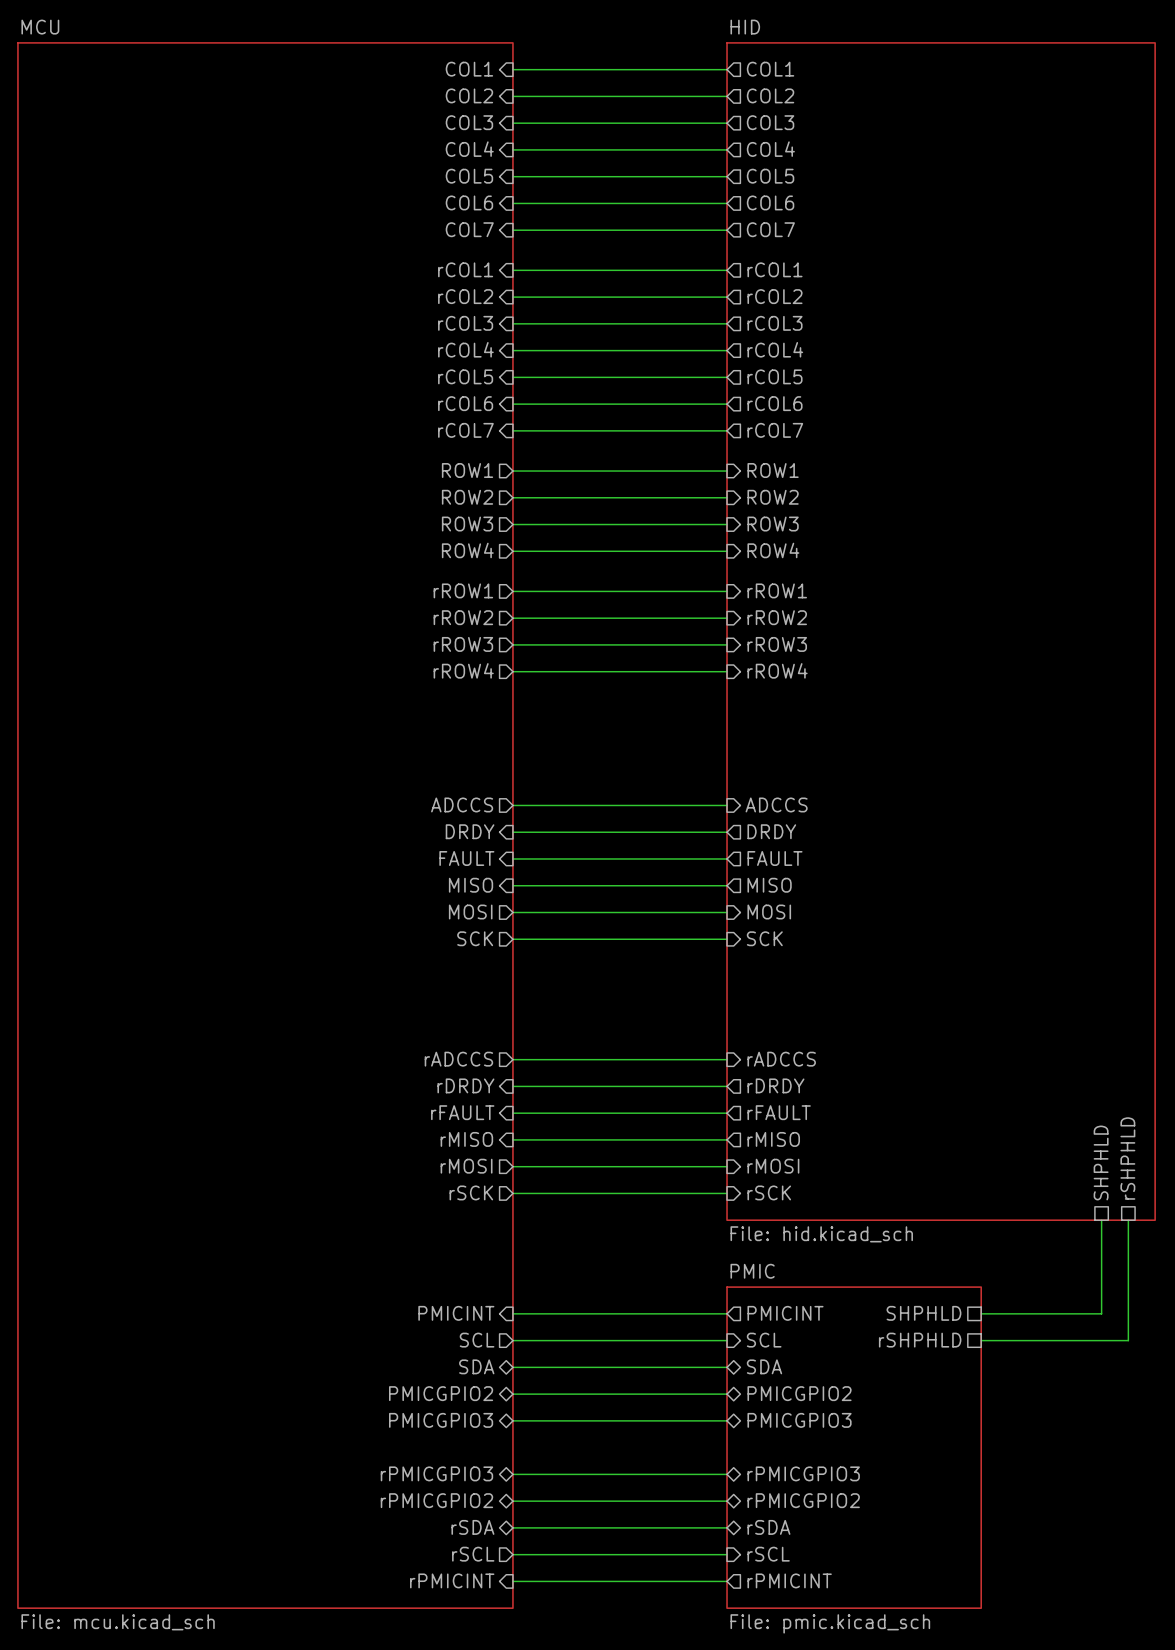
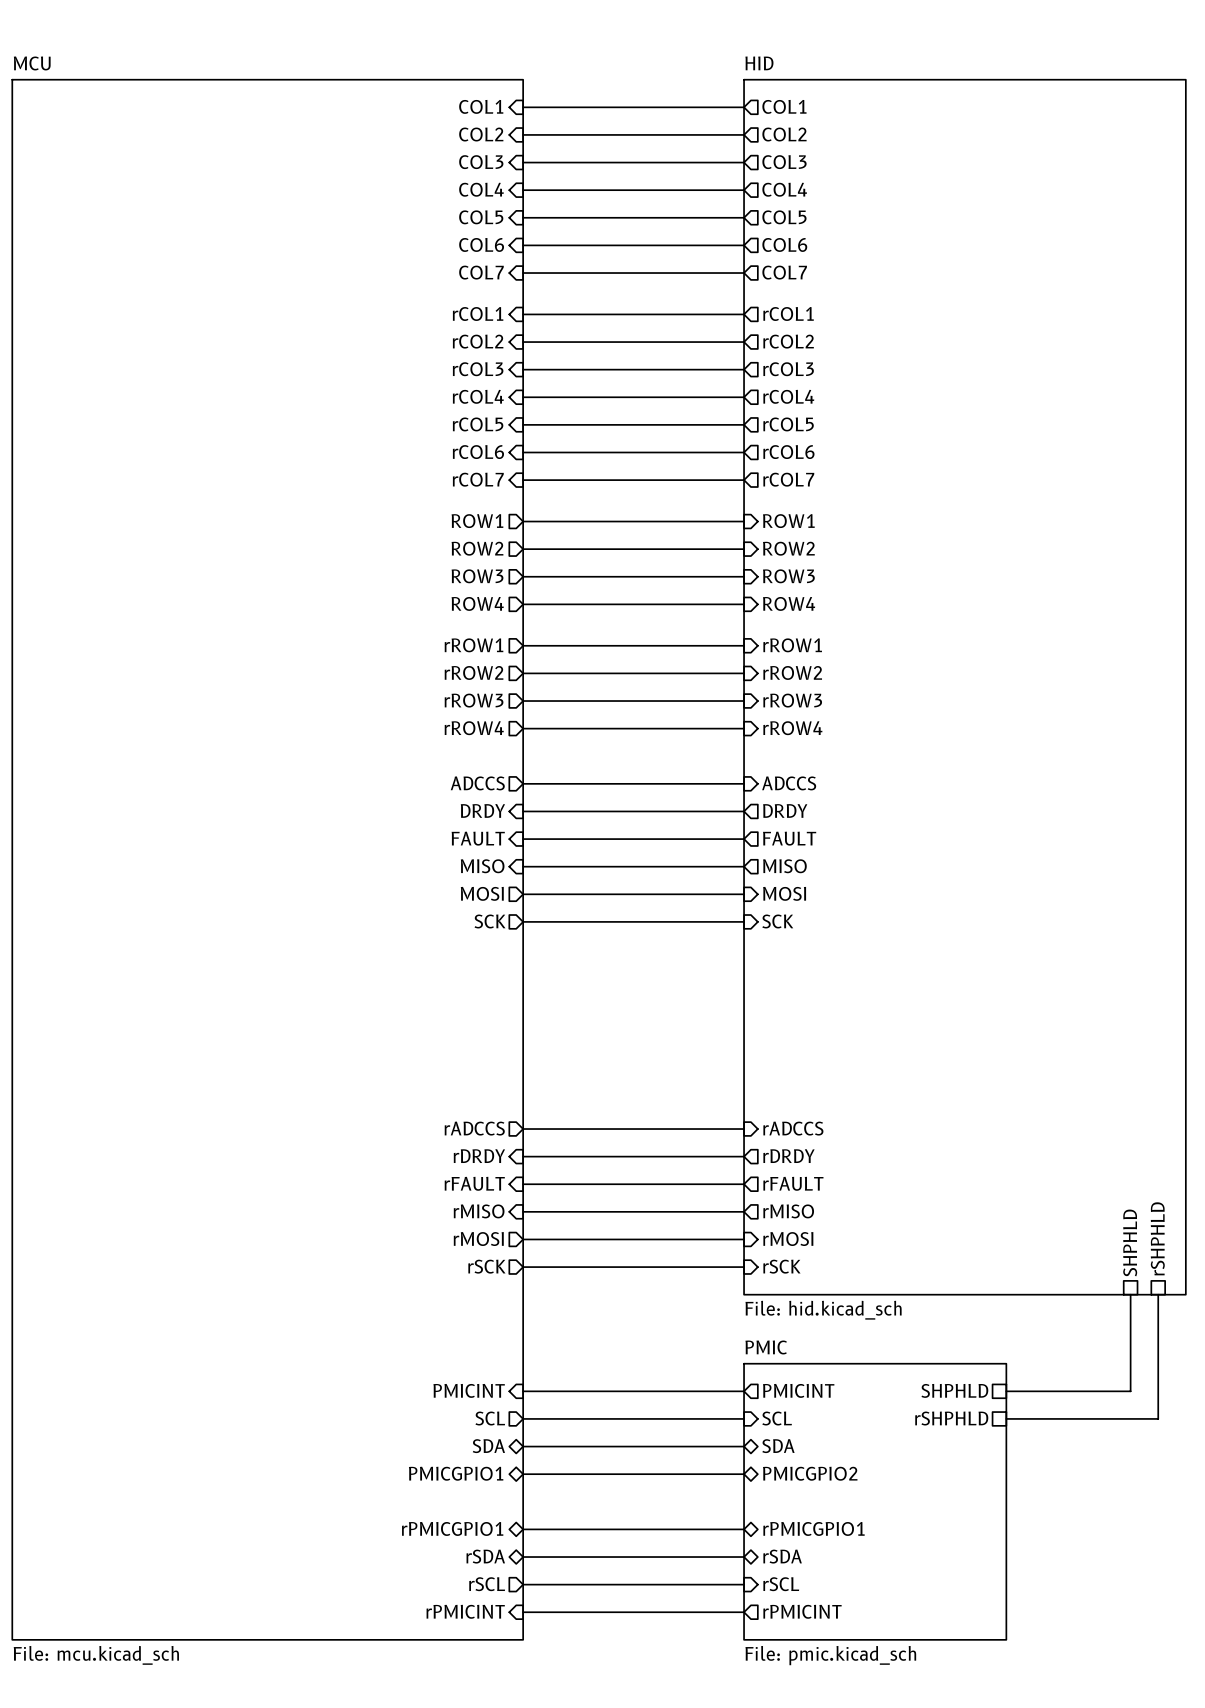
sheet MCU name position: MCU (40, 27) -> MCU (32, 63)
sheet MCU shape: [17, 42, 514, 1609] -> [11, 78, 524, 1641]
sheet pin: COL1 (469, 69) -> none
wire: (512, 69) (727, 69) -> none
sheet pin: COL1 (770, 69) -> none
sheet pin: COL2 (469, 95) -> COL1 (481, 106)
sheet pin: COL2 (770, 95) -> COL1 (784, 106)
sheet pin: COL3 (469, 122) -> COL2 (481, 134)
sheet pin: COL3 (770, 122) -> COL2 (784, 134)
sheet pin: COL4 (469, 149) -> COL3 (481, 162)
sheet pin: COL4 (770, 149) -> COL3 (784, 162)
sheet pin: COL5 (469, 176) -> COL4 (481, 189)
sheet pin: COL5 (770, 176) -> COL4 (784, 189)
sheet pin: COL6 (469, 202) -> COL5 (481, 217)
sheet pin: COL6 (770, 202) -> COL5 (784, 217)
sheet pin: COL7 (469, 229) -> COL6 (481, 244)
sheet pin: COL7 (770, 229) -> COL6 (784, 244)
sheet pin: rCOL1 (465, 269) -> COL7 (481, 272)
sheet pin: rCOL1 (775, 269) -> COL7 (784, 272)
wire: (512, 270) (727, 270) -> (523, 273) (744, 273)
sheet pin: rCOL2 (465, 296) -> rCOL1 (478, 313)
sheet pin: rCOL2 (775, 296) -> rCOL1 (788, 313)
sheet pin: rCOL3 (465, 323) -> rCOL2 (478, 341)
sheet pin: rCOL3 (775, 323) -> rCOL2 (788, 341)
sheet pin: rCOL4 (465, 349) -> rCOL3 (478, 369)
sheet pin: rCOL4 (775, 349) -> rCOL3 (788, 369)
sheet pin: rCOL5 (465, 376) -> rCOL4 (478, 396)
sheet pin: rCOL5 (775, 376) -> rCOL4 (788, 396)
sheet pin: rCOL6 (465, 403) -> rCOL5 (478, 424)
sheet pin: rCOL6 (775, 403) -> rCOL5 (788, 424)
sheet pin: rCOL7 (465, 430) -> rCOL6 (478, 452)
sheet pin: rCOL7 (775, 430) -> rCOL6 (788, 452)
sheet pin: none -> rCOL7 (478, 479)
sheet pin: none -> rCOL7 (788, 479)
sheet pin: ROW1 (467, 470) -> none
sheet pin: ROW1 (773, 470) -> none
wire: (512, 471) (727, 471) -> (523, 480) (744, 480)
sheet pin: ROW2 (467, 497) -> ROW1 (477, 521)
sheet pin: ROW2 (773, 497) -> ROW1 (788, 521)
sheet pin: ROW3 (467, 524) -> ROW2 (477, 548)
sheet pin: ROW3 (773, 524) -> ROW2 (788, 548)
sheet pin: ROW4 (467, 550) -> ROW3 (477, 576)
sheet pin: ROW4 (773, 550) -> ROW3 (788, 576)
sheet pin: rROW1 (463, 590) -> ROW4 (477, 603)
sheet pin: rROW1 (777, 590) -> ROW4 (789, 603)
wire: (512, 591) (727, 591) -> (523, 604) (744, 604)
sheet pin: rROW2 (463, 617) -> rROW1 (474, 645)
sheet pin: rROW2 (777, 617) -> rROW1 (792, 645)
sheet HID position: (941, 631) -> (964, 687)
sheet pin: rROW3 (463, 644) -> rROW2 (474, 672)
sheet pin: rROW3 (777, 644) -> rROW2 (792, 672)
sheet pin: rROW4 (463, 670) -> rROW3 (474, 700)
sheet pin: rROW4 (777, 670) -> rROW3 (792, 700)
sheet pin: none -> rROW4 (474, 728)
sheet pin: none -> rROW4 (792, 728)
wire: none -> (523, 728) (744, 728)
sheet pin: none -> ADCCS (477, 783)
sheet pin: none -> ADCCS (789, 783)
sheet pin: none -> DRDY (482, 810)
sheet pin: none -> DRDY (785, 810)
sheet pin shape: output (462, 804) -> input (478, 838)
sheet pin: ADCCS (462, 804) -> FAULT (478, 838)
sheet pin shape: input (776, 804) -> output (789, 838)
sheet pin: ADCCS (776, 804) -> FAULT (789, 838)
sheet pin: DRDY (470, 831) -> MISO (482, 866)
sheet pin: DRDY (771, 831) -> MISO (784, 866)
sheet pin shape: input (466, 858) -> output (482, 893)
sheet pin: FAULT (466, 858) -> MOSI (482, 893)
sheet pin shape: output (775, 858) -> input (784, 893)
sheet pin: FAULT (775, 858) -> MOSI (784, 893)
sheet pin shape: input (471, 885) -> output (490, 921)
sheet pin: MISO (471, 885) -> SCK (490, 921)
sheet pin shape: output (769, 885) -> input (777, 921)
sheet pin: MISO (769, 885) -> SCK (777, 921)
sheet pin: MOSI (470, 912) -> none
wire: (512, 912) (727, 912) -> (523, 811) (744, 811)
sheet pin: MOSI (769, 912) -> none
sheet pin: SCK (475, 938) -> none
sheet pin: SCK (764, 938) -> none
wire: (512, 939) (727, 939) -> (523, 783) (744, 783)
sheet pin: rADCCS (458, 1059) -> none
wire: (512, 1059) (727, 1059) -> (523, 1267) (744, 1267)
sheet pin: rADCCS (781, 1059) -> none
sheet pin shape: input (465, 1085) -> output (474, 1128)
sheet pin: rDRDY (465, 1085) -> rADCCS (474, 1128)
sheet pin shape: output (775, 1085) -> input (793, 1128)
sheet pin: rDRDY (775, 1085) -> rADCCS (793, 1128)
sheet pin: rFAULT (462, 1112) -> rDRDY (479, 1156)
sheet pin: rFAULT (779, 1112) -> rDRDY (789, 1156)
sheet pin: rMISO (466, 1139) -> rFAULT (474, 1183)
sheet pin: rMISO (773, 1139) -> rFAULT (793, 1183)
sheet pin position: rSHPHLD (1127, 1158) -> rSHPHLD (1157, 1238)
sheet pin position: SHPHLD (1101, 1162) -> SHPHLD (1130, 1242)
sheet pin shape: output (466, 1166) -> input (479, 1211)
sheet pin: rMOSI (466, 1166) -> rMISO (479, 1211)
sheet pin shape: input (773, 1166) -> output (788, 1211)
sheet pin: rMOSI (773, 1166) -> rMISO (788, 1211)
sheet pin: rSCK (471, 1192) -> rMOSI (478, 1239)
sheet pin: rSCK (769, 1192) -> rMOSI (788, 1239)
sheet pin: none -> rSCK (486, 1266)
sheet pin: none -> rSCK (781, 1266)
wire: (1101, 1220) (1101, 1246) -> none
wire: (1128, 1220) (1128, 1246) -> none
sheet PMIC name position: PMIC (752, 1271) -> PMIC (766, 1347)
sheet PMIC shape: [726, 1286, 983, 1609] -> [743, 1362, 1008, 1641]
sheet pin: PMICINT (456, 1313) -> none
wire: (512, 1313) (727, 1313) -> none
sheet pin: PMICINT (785, 1313) -> none
sheet pin: SHPHLD (923, 1313) -> none
wire: (981, 1313) (1101, 1313) -> none
sheet pin shape: output (477, 1340) -> input (469, 1390)
sheet pin: SCL (477, 1340) -> PMICINT (469, 1390)
sheet pin shape: input (764, 1340) -> output (798, 1390)
sheet pin: SCL (764, 1340) -> PMICINT (798, 1390)
sheet pin: rSHPHLD (920, 1340) -> SHPHLD (954, 1390)
wire: (1101, 1340) (1128, 1340) -> (1130, 1391) (1130, 1363)
wire: none -> (1158, 1391) (1158, 1418) (1006, 1418)
sheet pin shape: bidirectional (476, 1366) -> output (490, 1418)
sheet pin: SDA (476, 1366) -> SCL (490, 1418)
sheet pin shape: bidirectional (764, 1366) -> input (777, 1418)
sheet pin: SDA (764, 1366) -> SCL (777, 1418)
sheet pin: none -> rSHPHLD (951, 1418)
sheet pin: PMICGPIO2 (441, 1393) -> SDA (488, 1446)
sheet pin: PMICGPIO2 (799, 1393) -> SDA (778, 1446)
sheet pin: PMICGPIO3 (441, 1420) -> PMICGPIO1 (456, 1473)
sheet pin: PMICGPIO3 (799, 1420) -> PMICGPIO2 (810, 1473)
sheet pin: rPMICGPIO3 (436, 1473) -> rPMICGPIO1 (452, 1528)
sheet pin: rPMICGPIO3 (803, 1473) -> rPMICGPIO1 (814, 1528)
sheet pin: rPMICGPIO2 (436, 1500) -> rSDA (485, 1556)
sheet pin: rPMICGPIO2 (803, 1500) -> rSDA (782, 1556)
sheet pin shape: bidirectional (472, 1527) -> output (487, 1584)
sheet pin: rSDA (472, 1527) -> rSCL (487, 1584)
sheet pin shape: bidirectional (768, 1527) -> input (781, 1584)
sheet pin: rSDA (768, 1527) -> rSCL (781, 1584)
sheet pin shape: output (473, 1554) -> input (465, 1611)
sheet pin: rSCL (473, 1554) -> rPMICINT (465, 1611)
sheet pin shape: input (768, 1554) -> output (802, 1611)
sheet pin: rSCL (768, 1554) -> rPMICINT (802, 1611)
sheet pin: rPMICINT (452, 1580) -> none
sheet pin: rPMICINT (789, 1580) -> none
wire: (512, 1581) (727, 1581) -> none
sheet MCU value position: File: mcu.kicad_sch (118, 1622) -> File: mcu.kicad_sch (96, 1655)
sheet PMIC value position: File: pmic.kicad_sch (830, 1623) -> File: pmic.kicad_sch (830, 1655)

